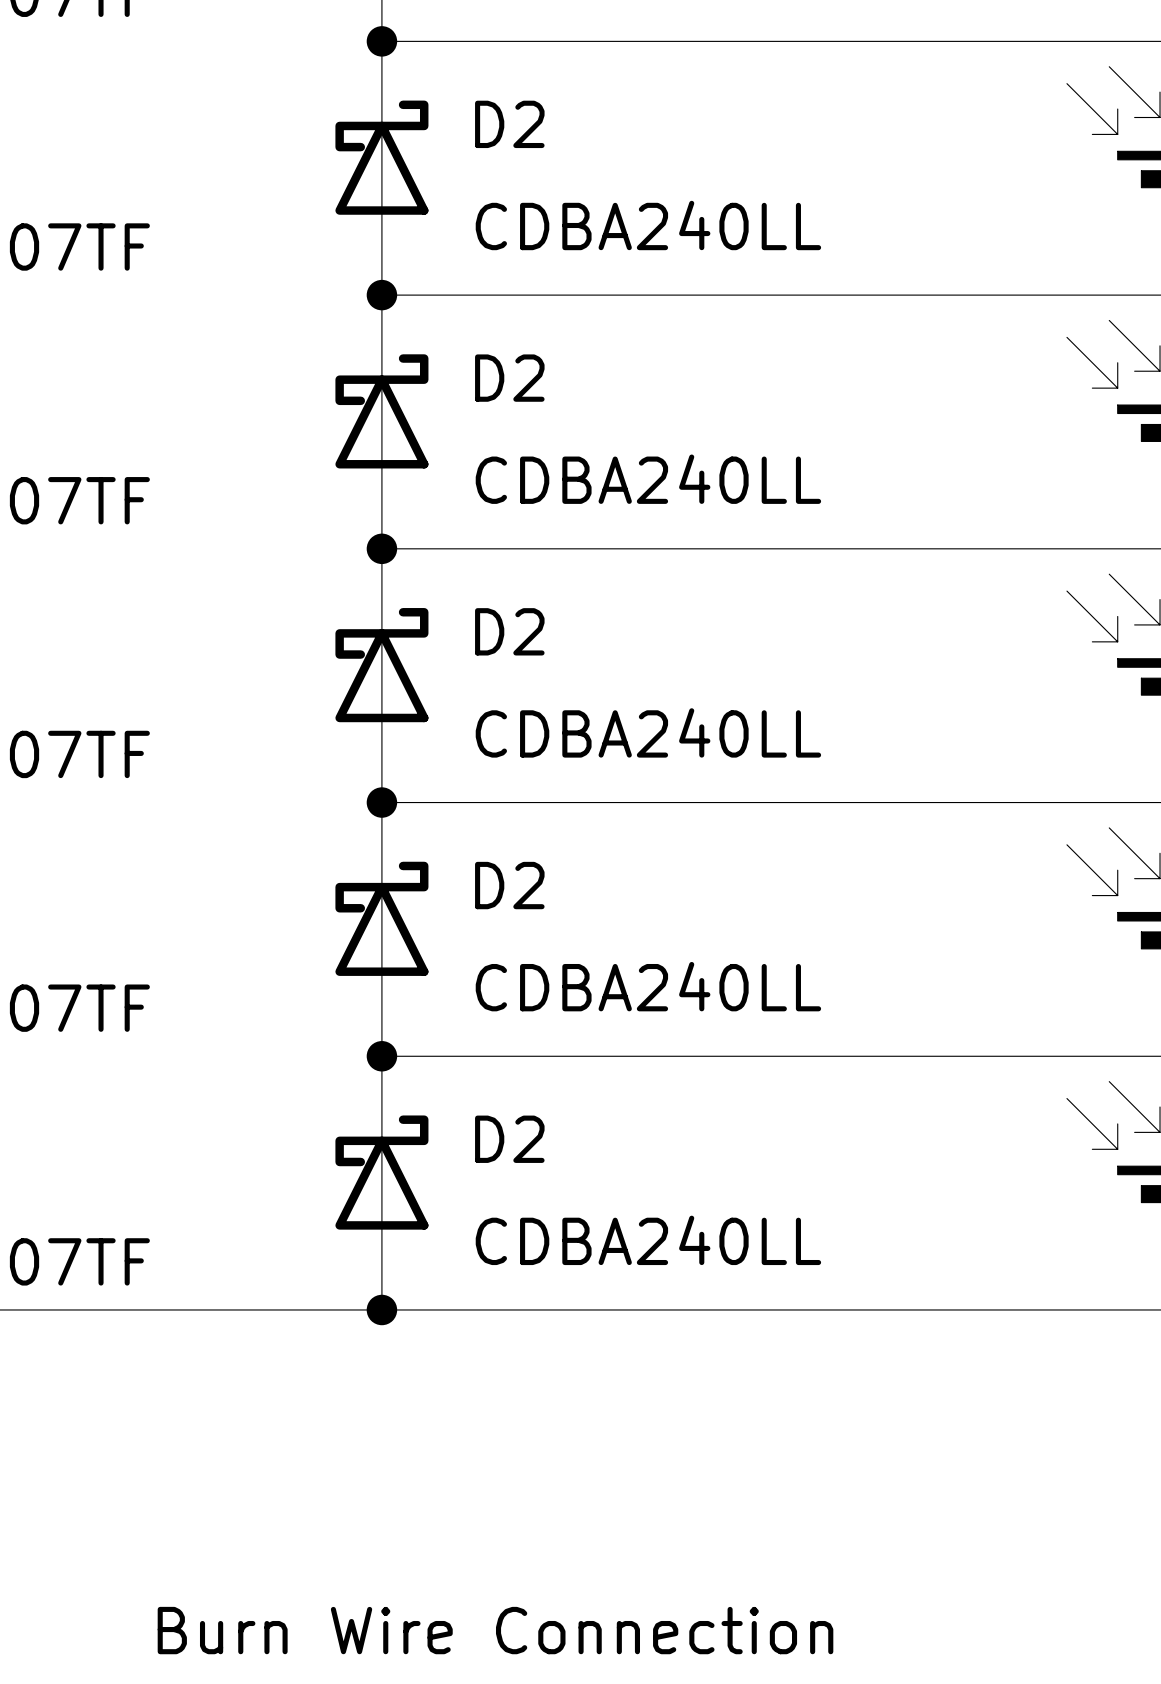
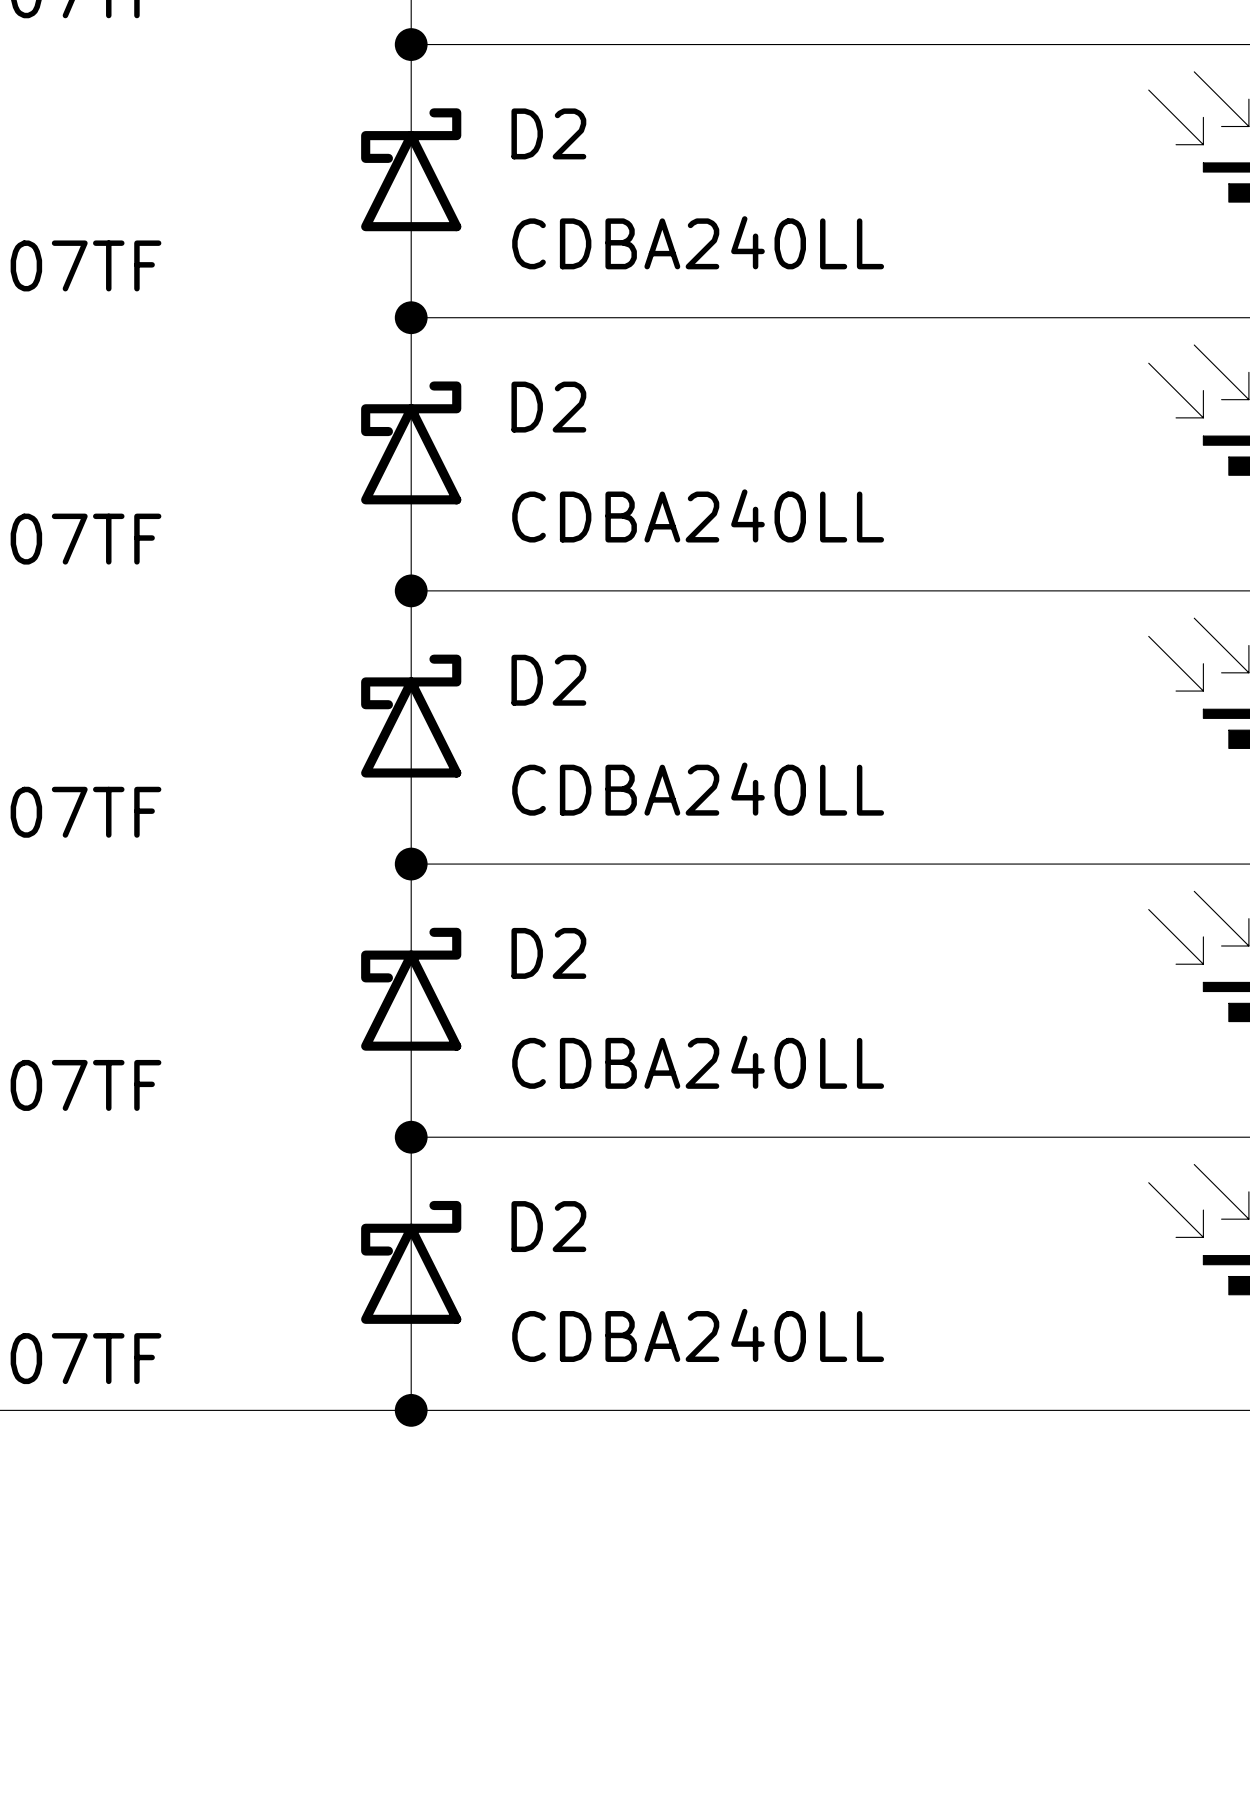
text: Burn Wire Connection (495, 1630) -> none

